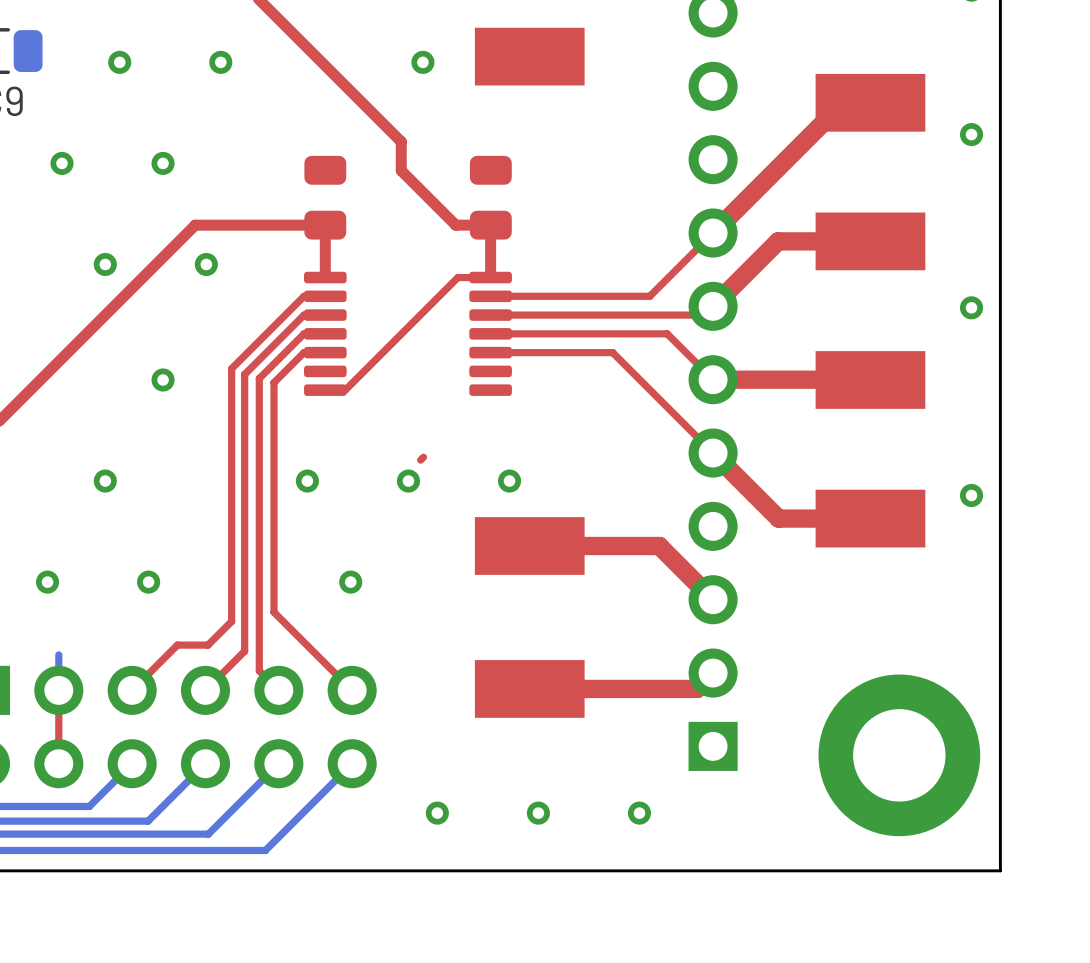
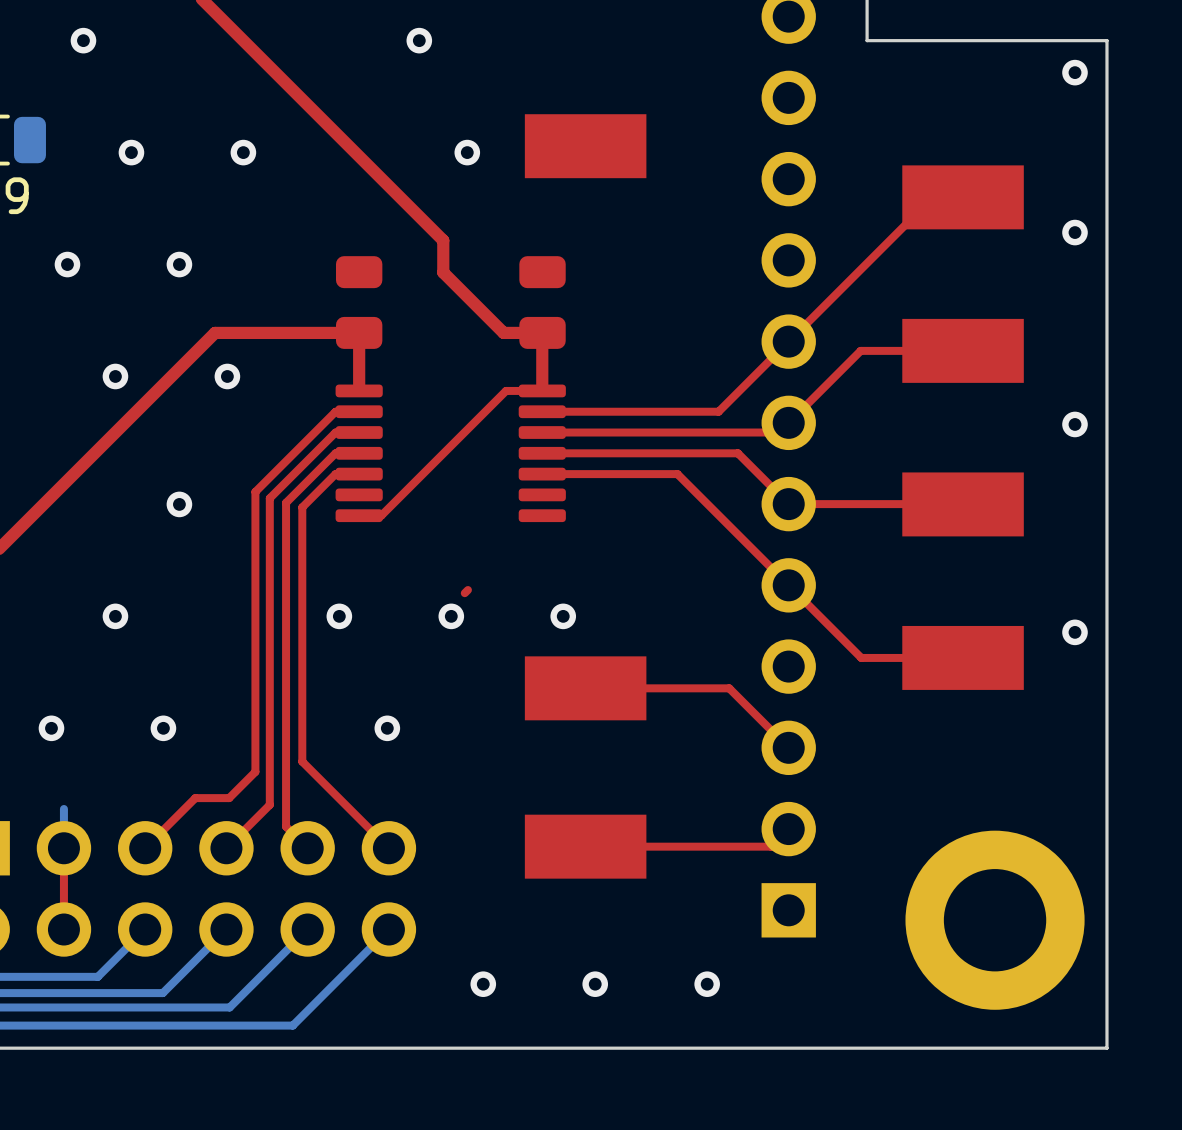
top track width: thick (870, 102) (843, 102) (713, 233) -> thin (963, 197) (932, 197) (788, 341)
top track width: thick (870, 241) (778, 241) (713, 306) -> thin (963, 350) (860, 350) (788, 422)
top track width: thick (870, 379) (713, 379) -> thin (962, 504) (788, 504)
top track width: thick (713, 453) (778, 518) (870, 518) -> thin (788, 585) (861, 657) (963, 657)
top track width: thick (529, 546) (659, 546) (713, 599) -> thin (585, 688) (729, 688) (788, 747)
top track width: thick (713, 673) (697, 688) (529, 688) -> thin (788, 829) (771, 846) (585, 846)

